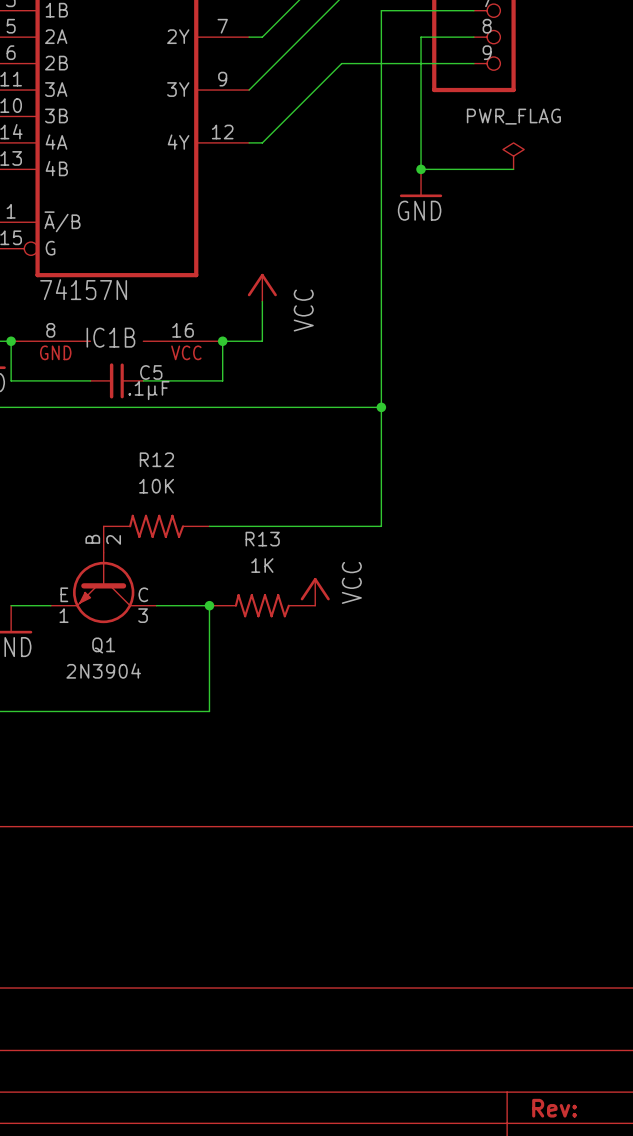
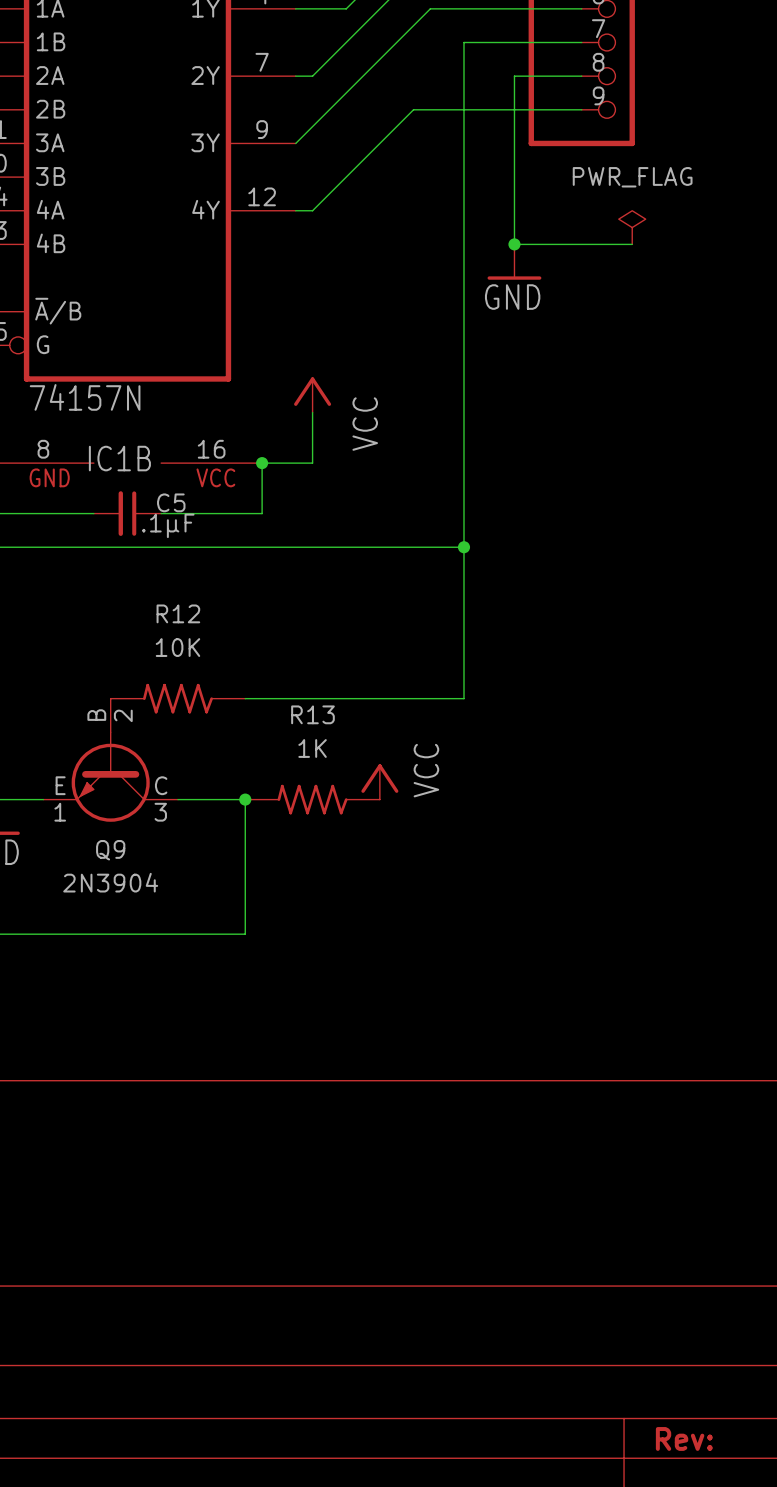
Q1 name: Q1 (103, 645) -> Q9 (110, 850)

